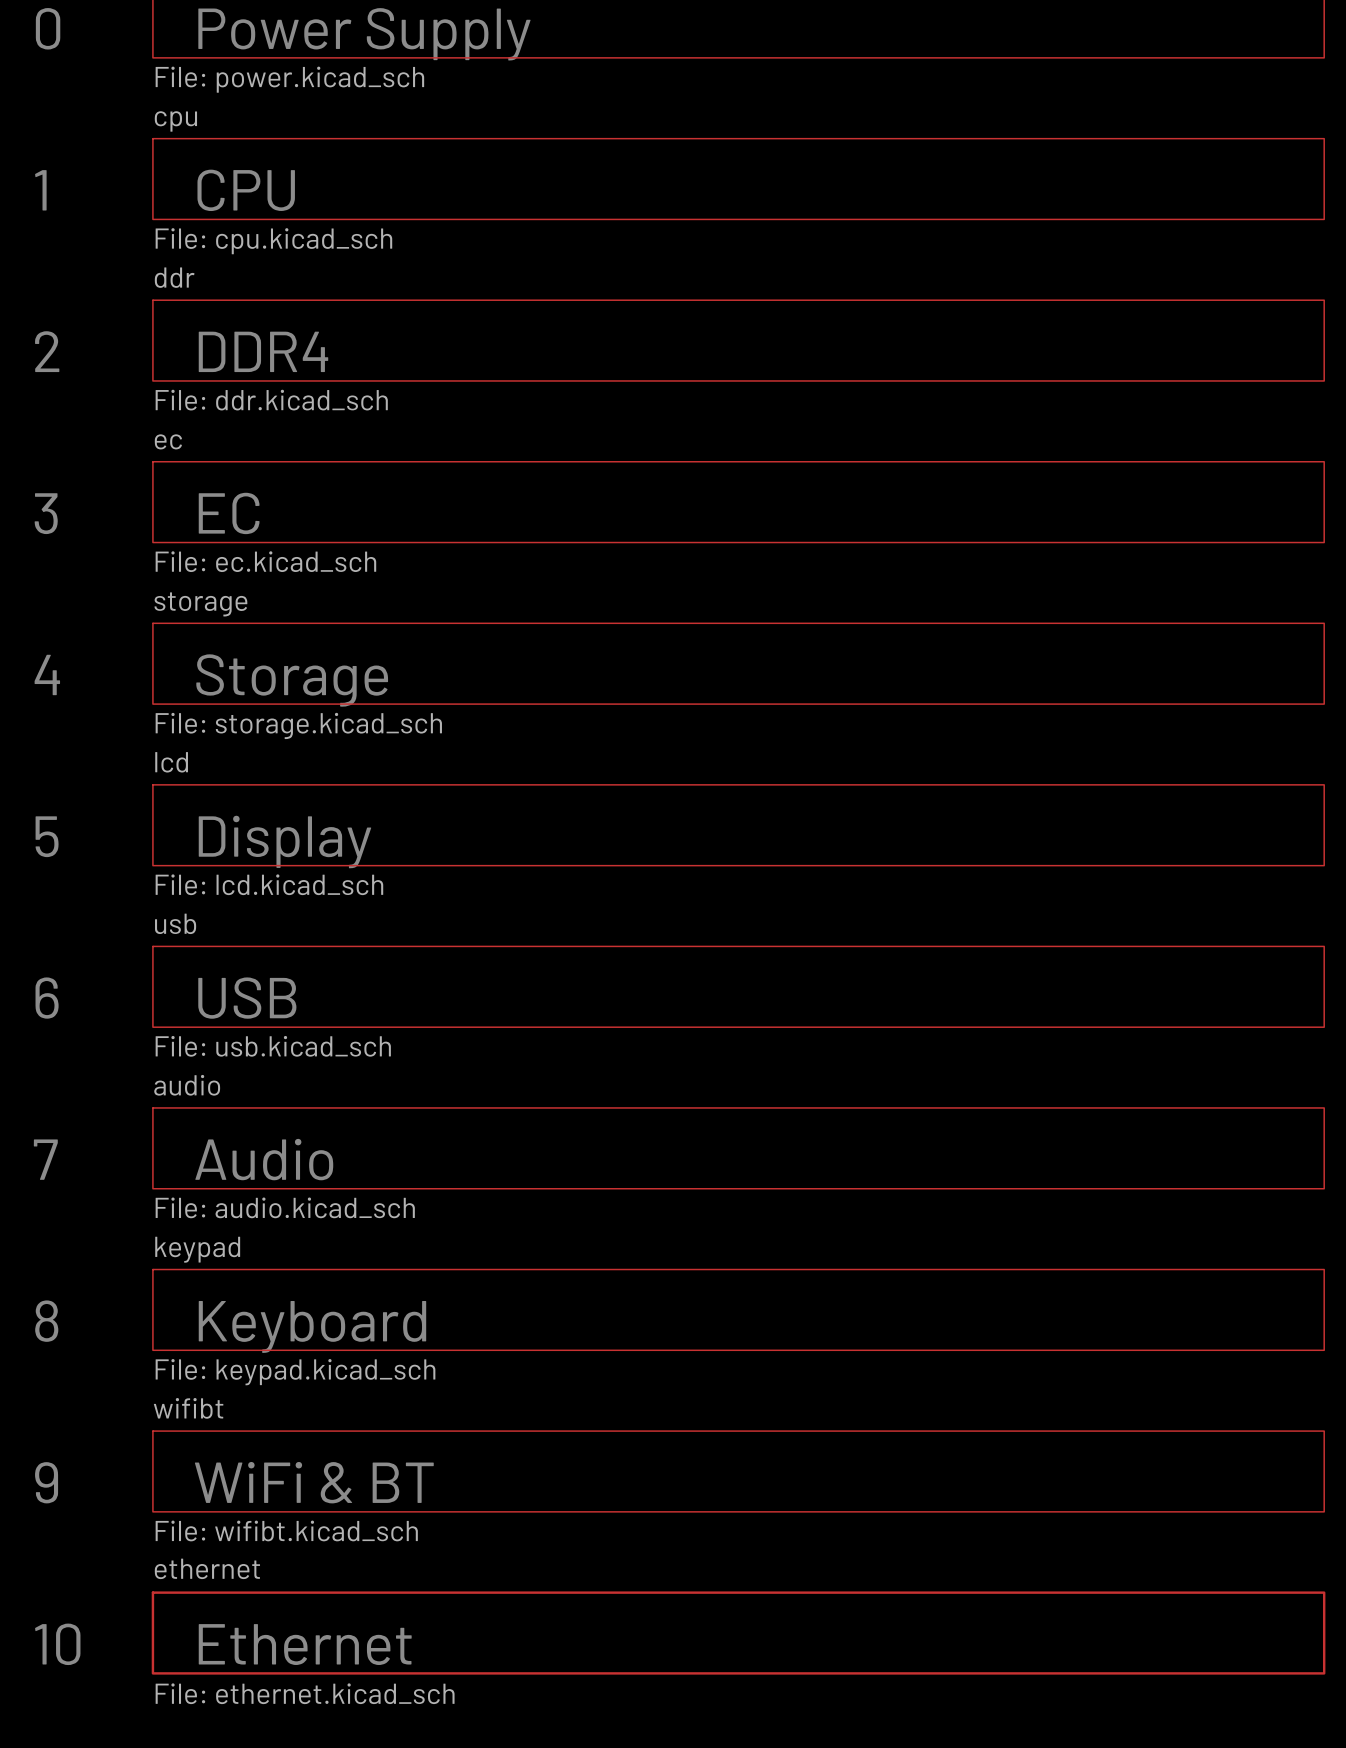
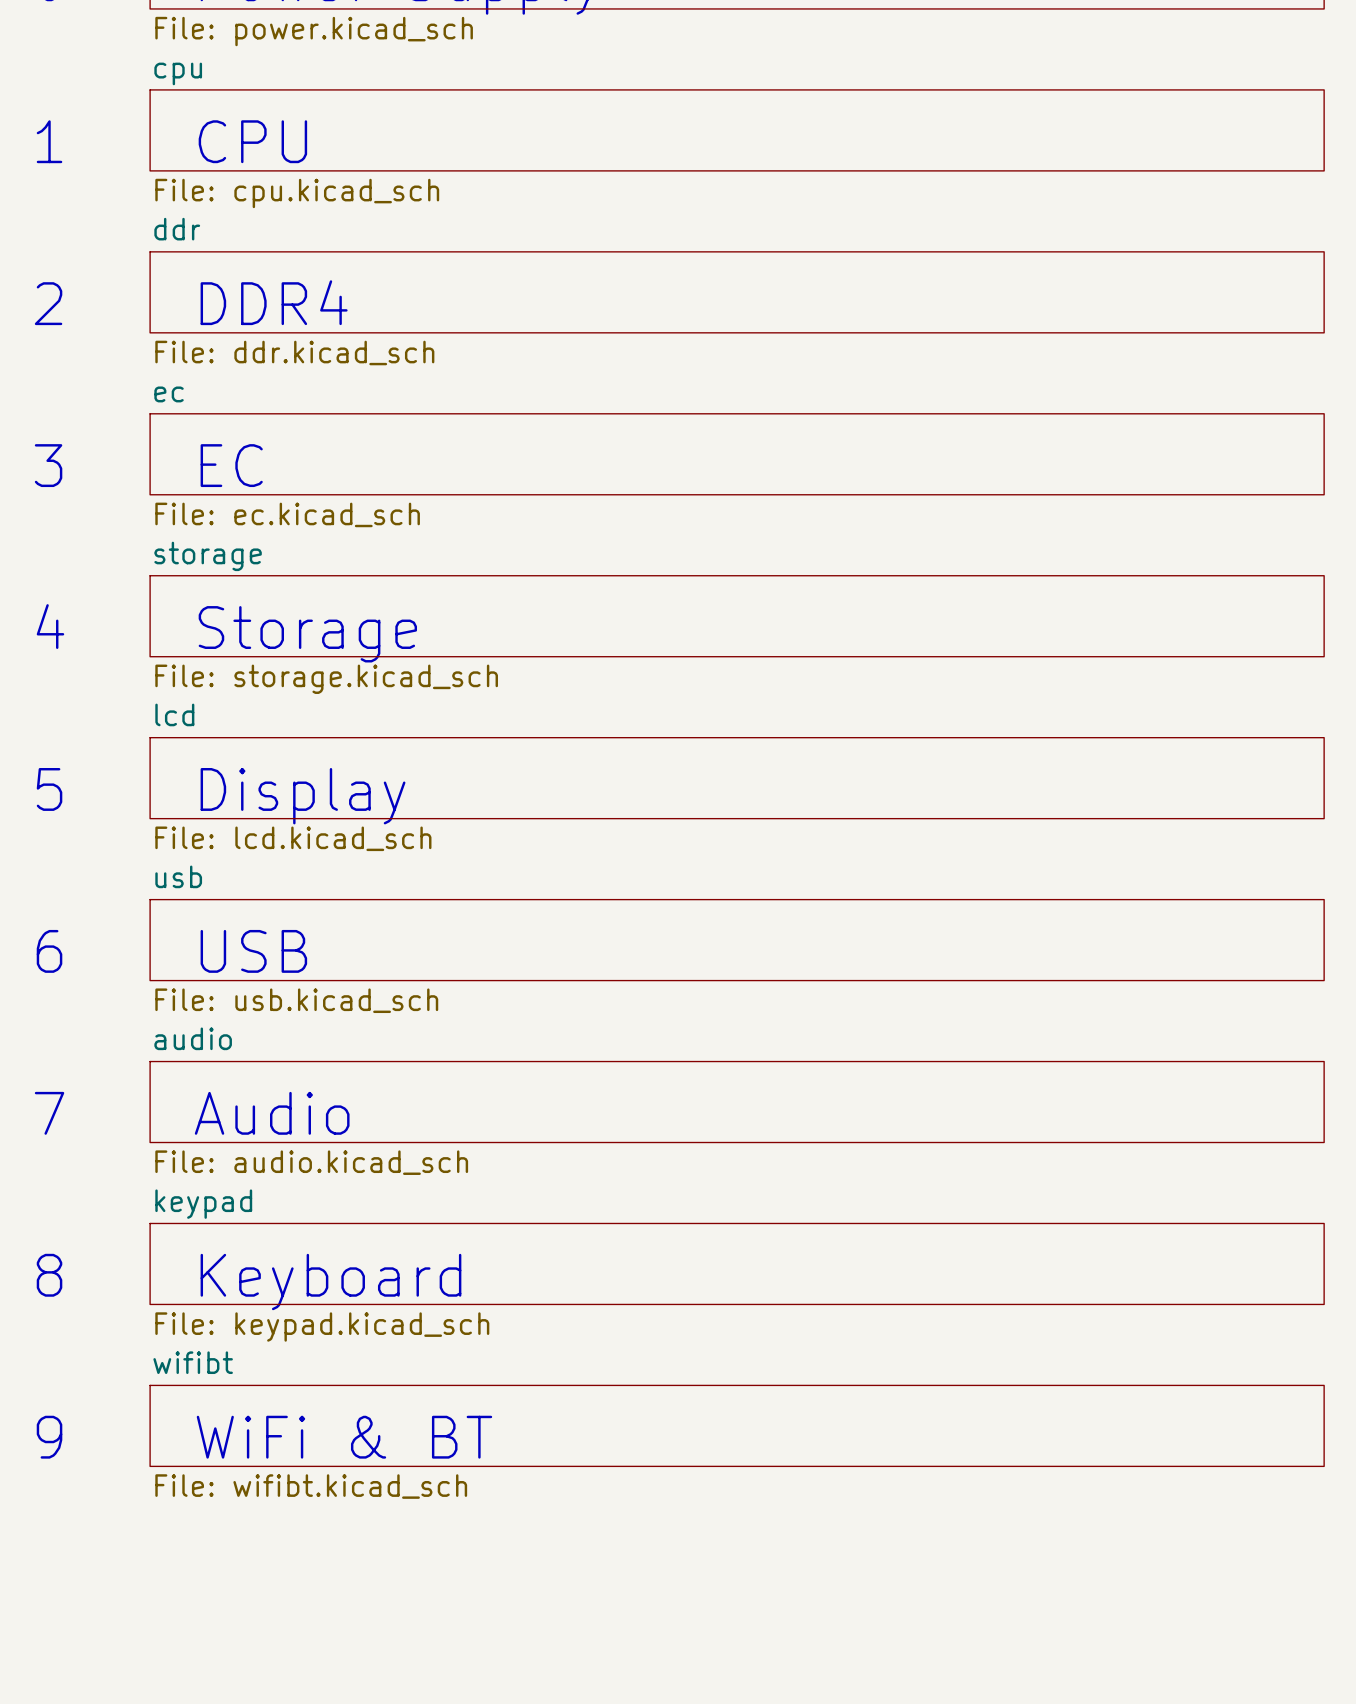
sheet ethernet: File: ethernet.kicad_sch (738, 1633) -> none
text: 10 (57, 1644) -> none
text: Ethernet (305, 1644) -> none

